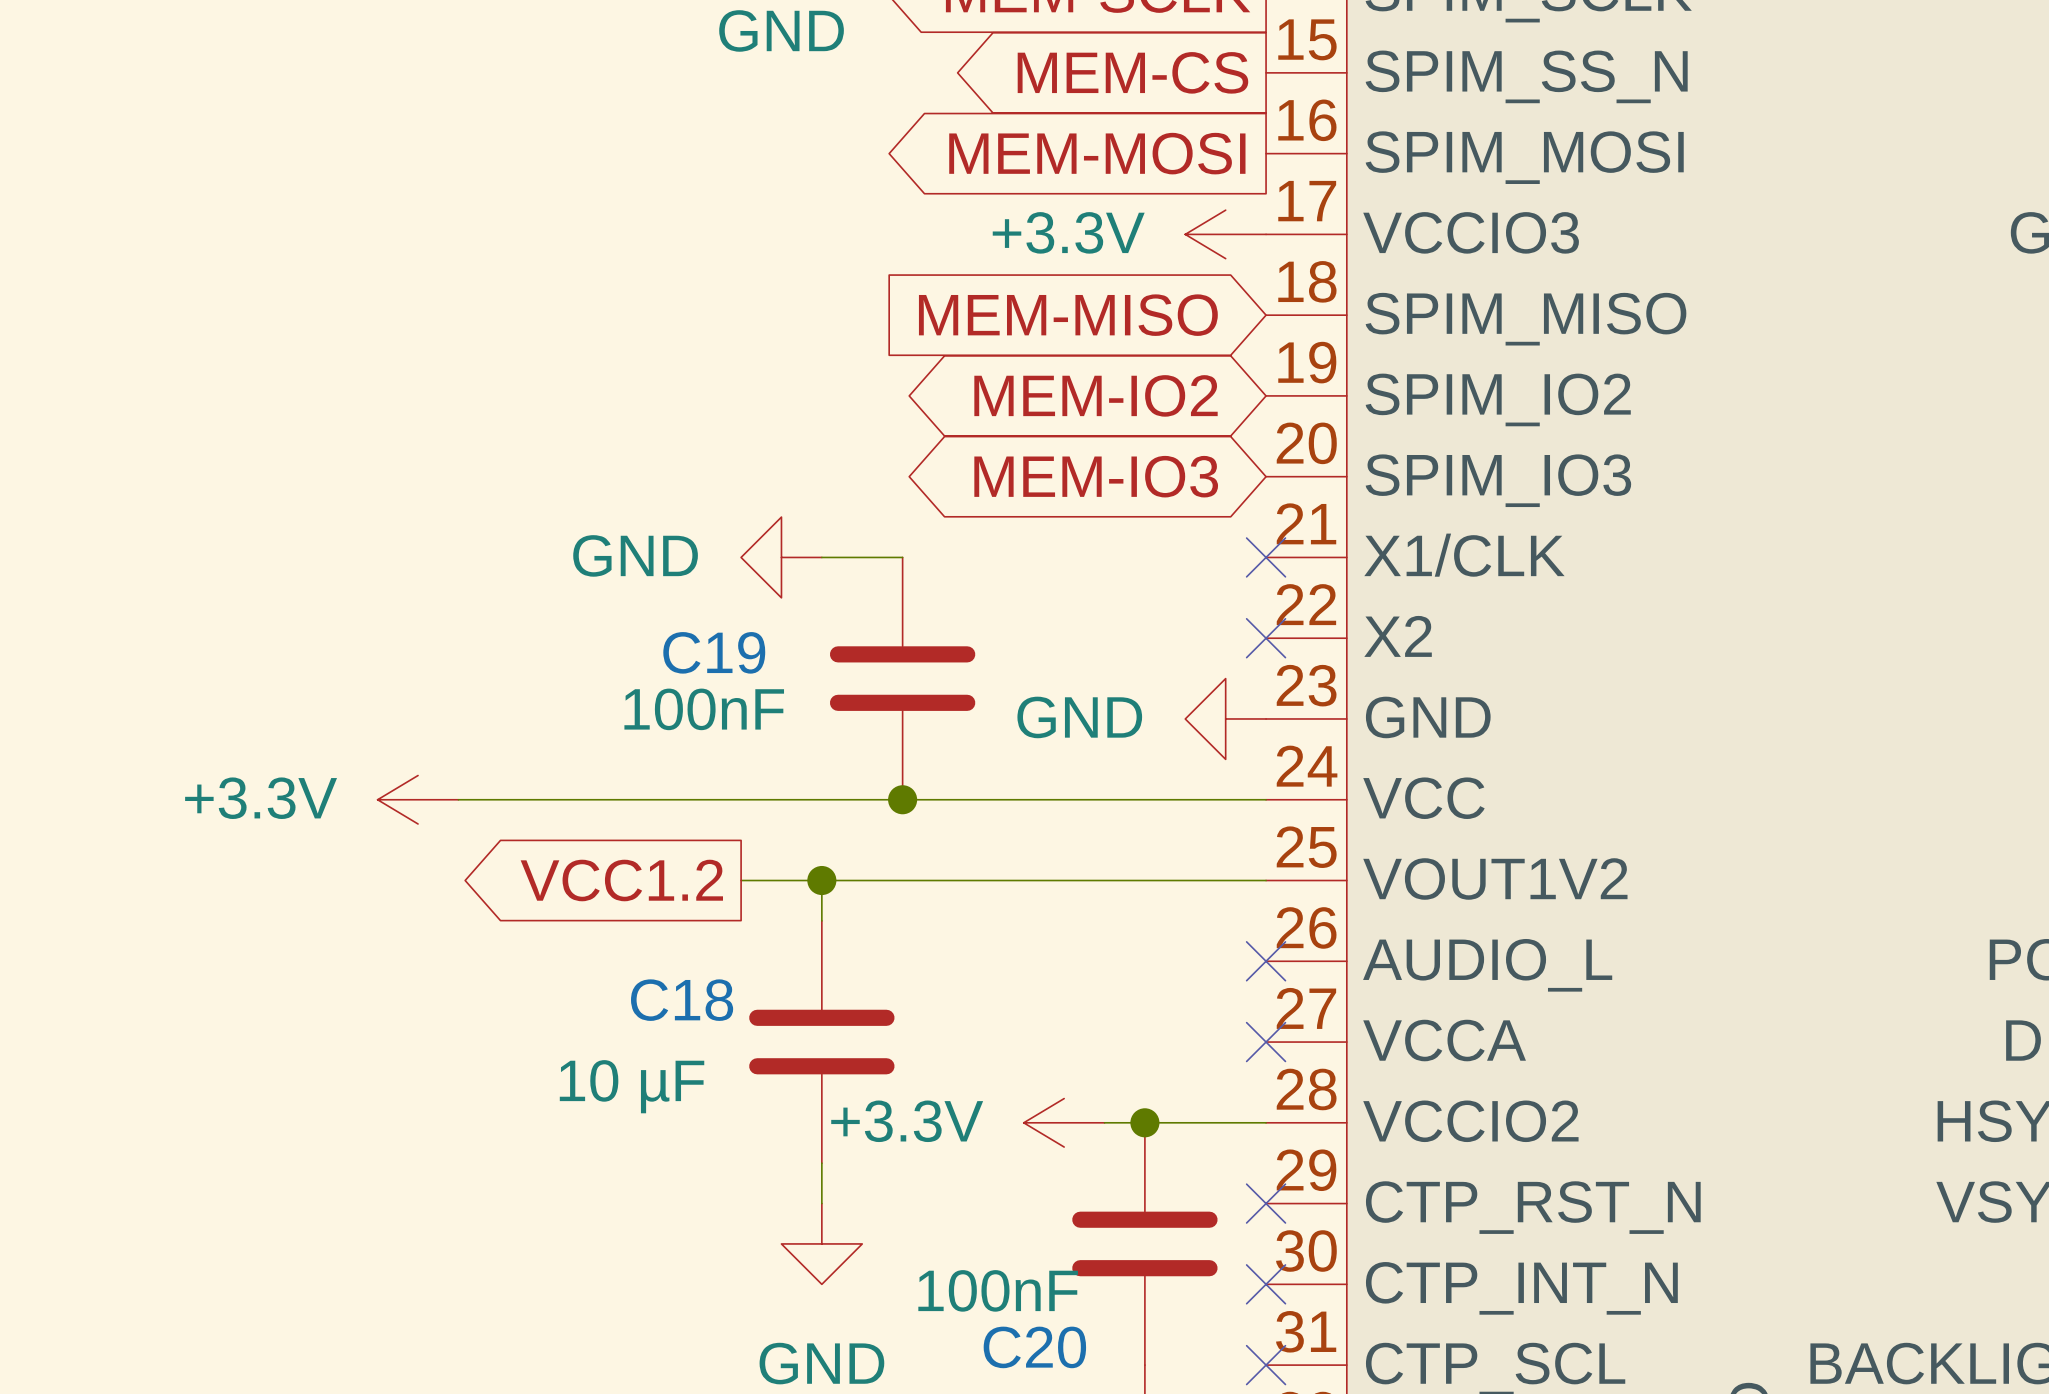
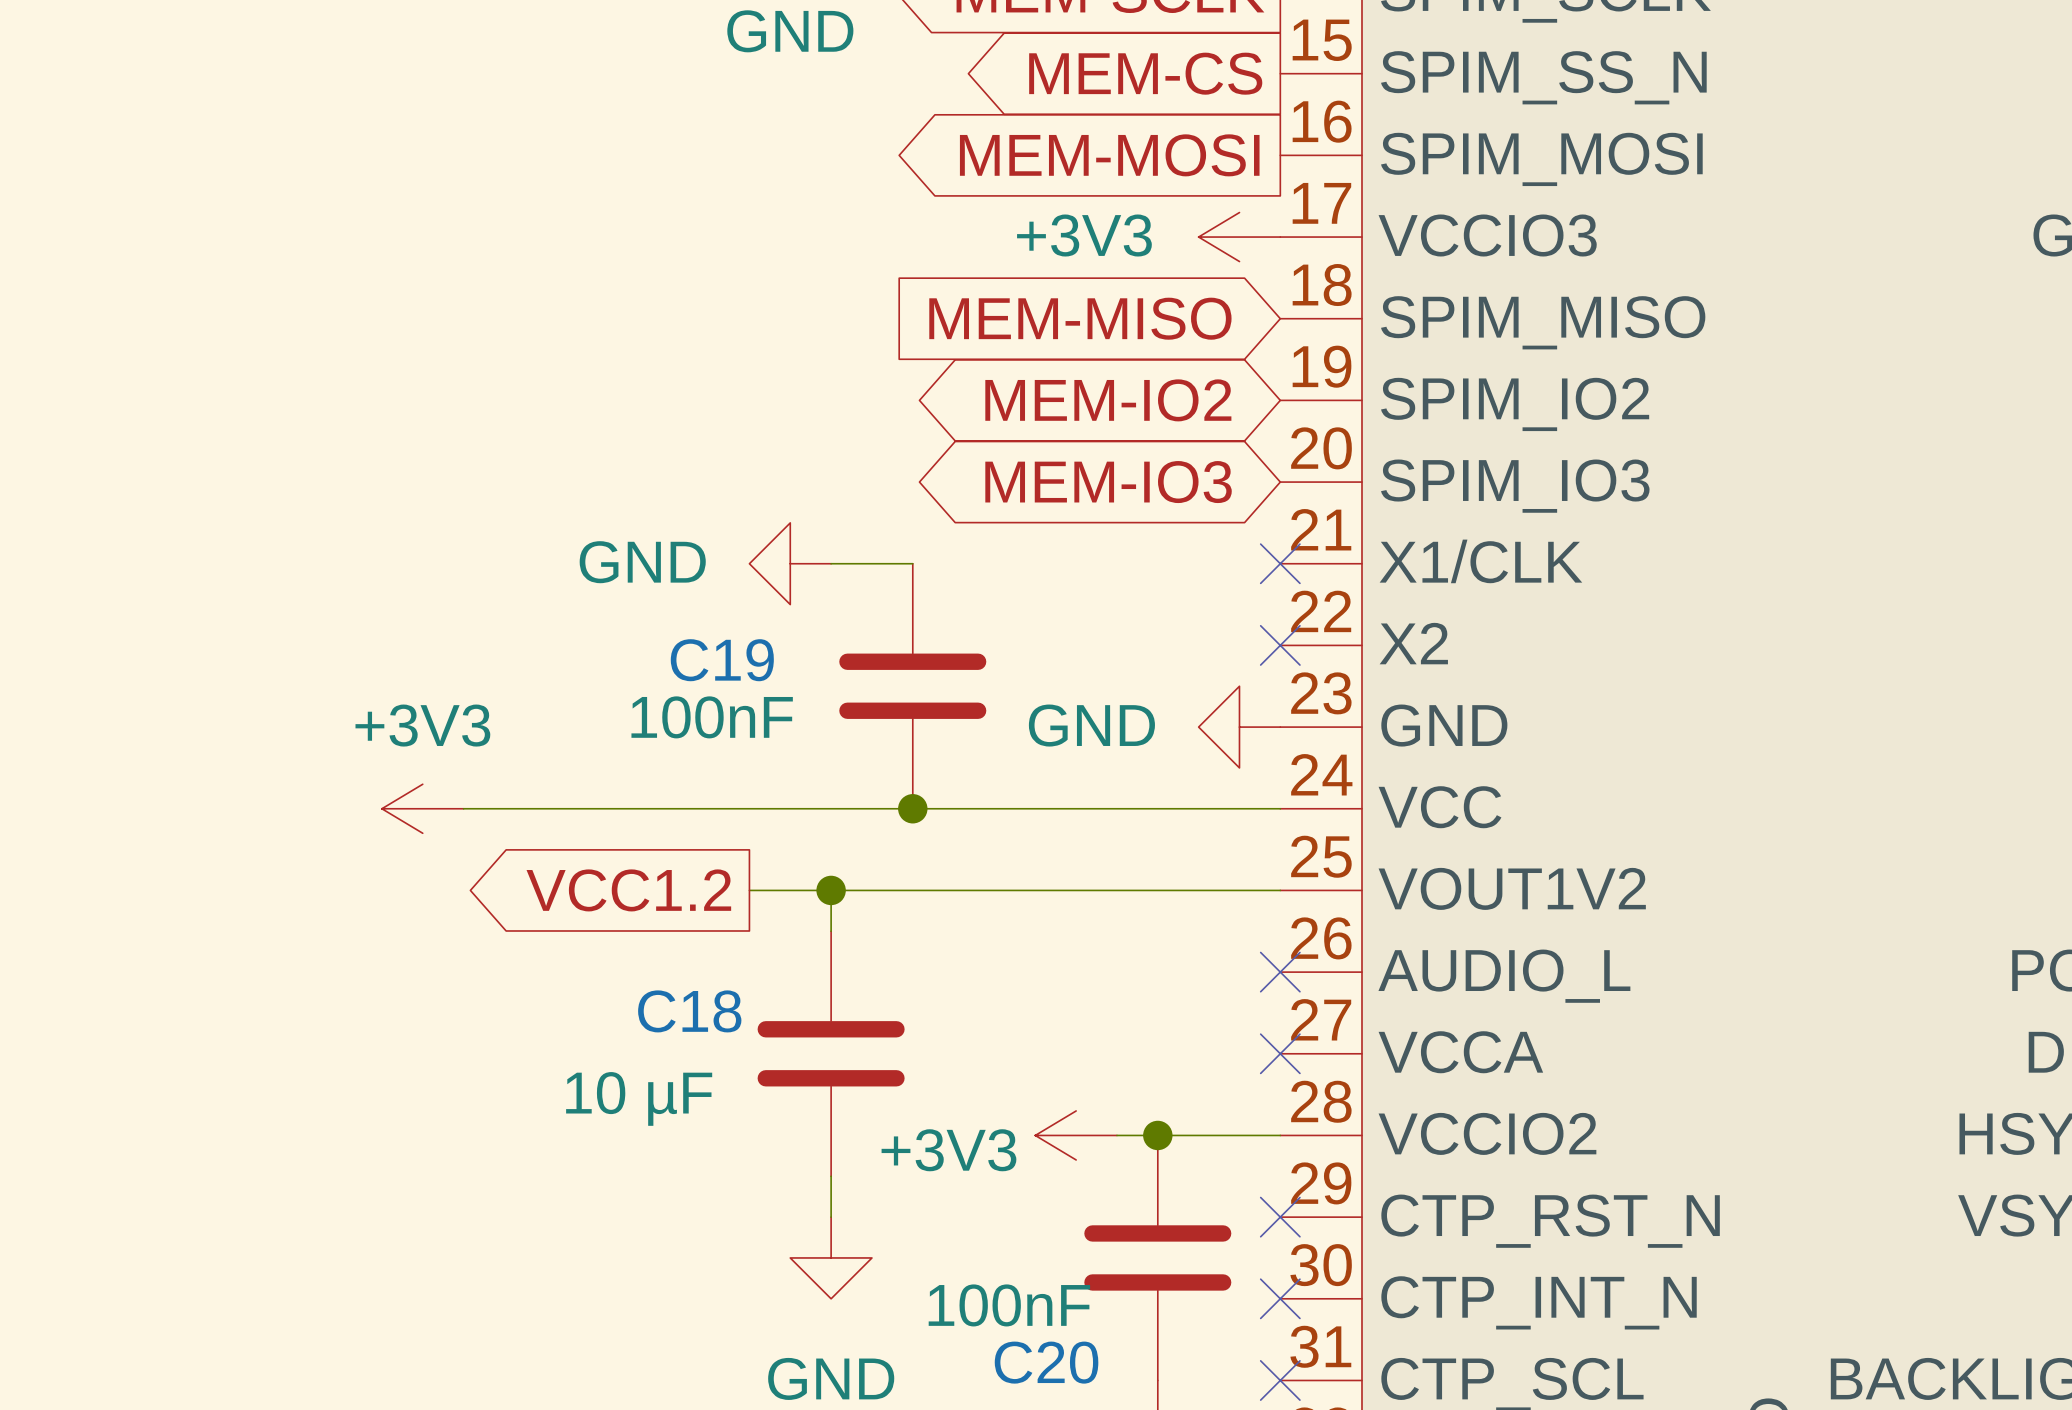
power symbol: +3.3V (1225, 234) -> +3V3 (1239, 237)
power symbol: +3.3V (418, 799) -> +3V3 (422, 808)
power symbol: +3.3V (1064, 1122) -> +3V3 (1076, 1135)

